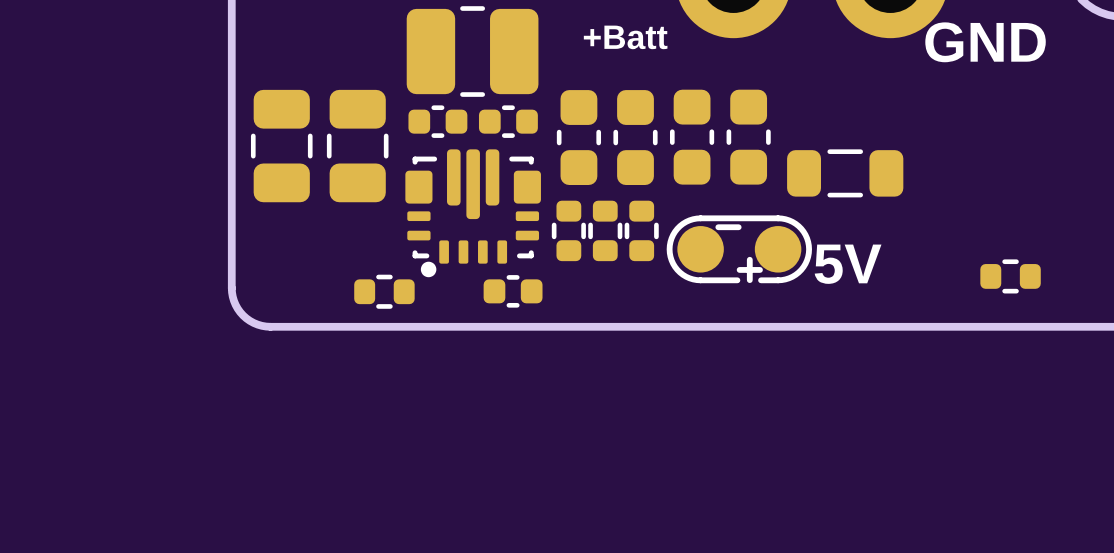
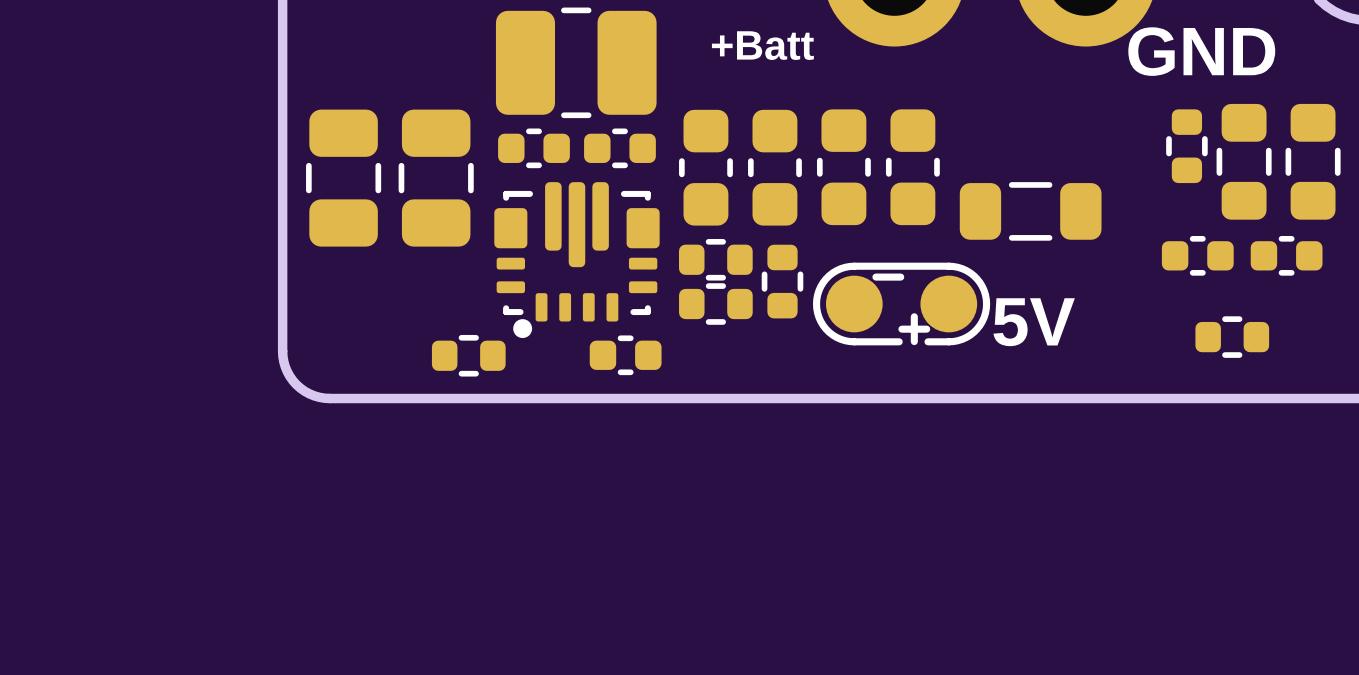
part: none -> (1186, 146)
part: none -> (1244, 161)
part: none -> (1313, 161)
part: none -> (1197, 255)
part: none -> (1286, 255)
part: none -> (715, 259)
part: (568, 230) -> none
part: (605, 230) -> none
part: none -> (715, 304)

